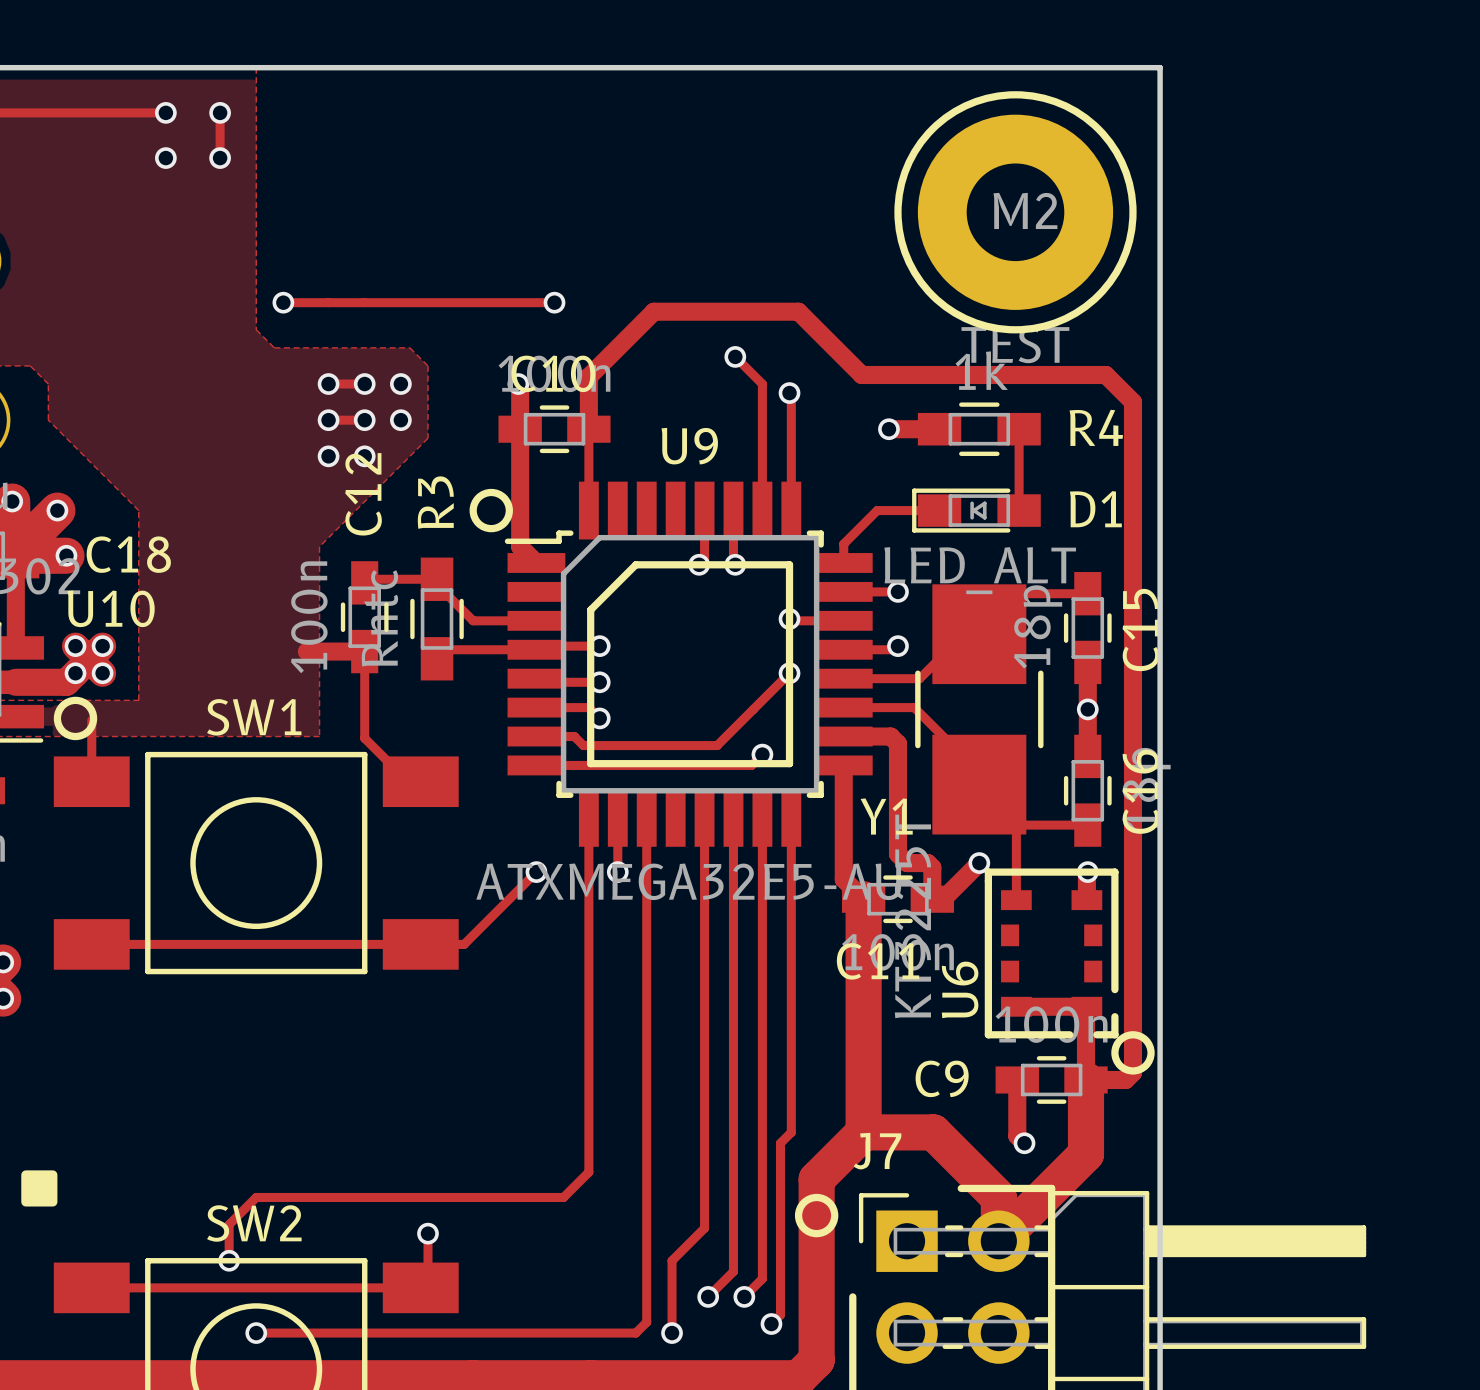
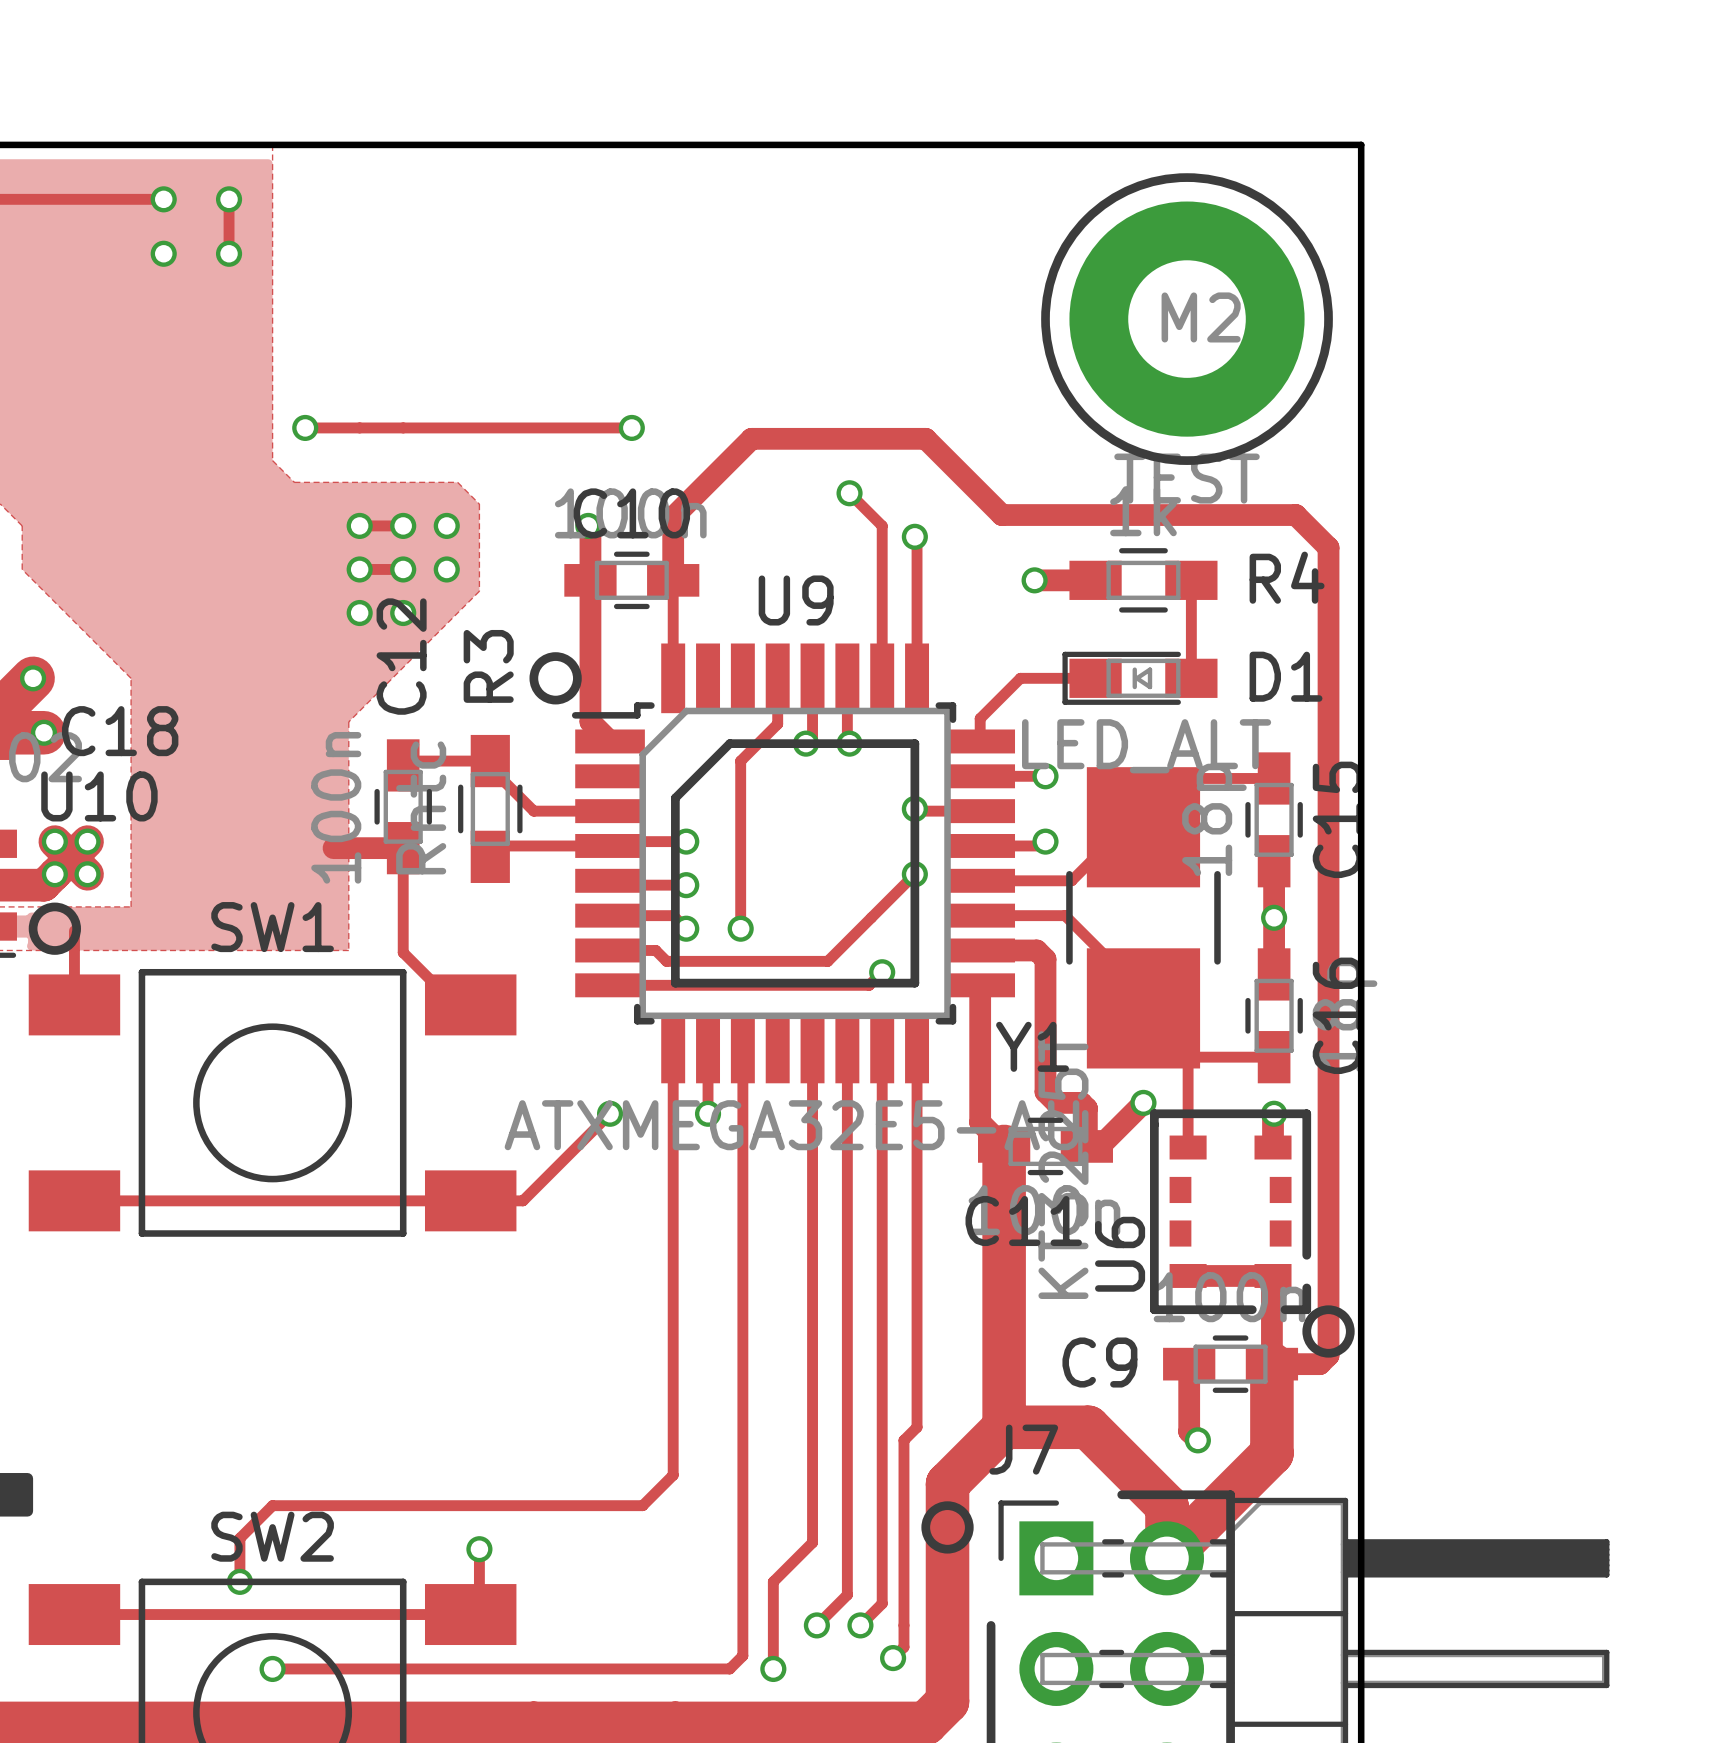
track: none -> (777, 678) (777, 724) (740, 761) (740, 928)
via: none -> (740, 928)

